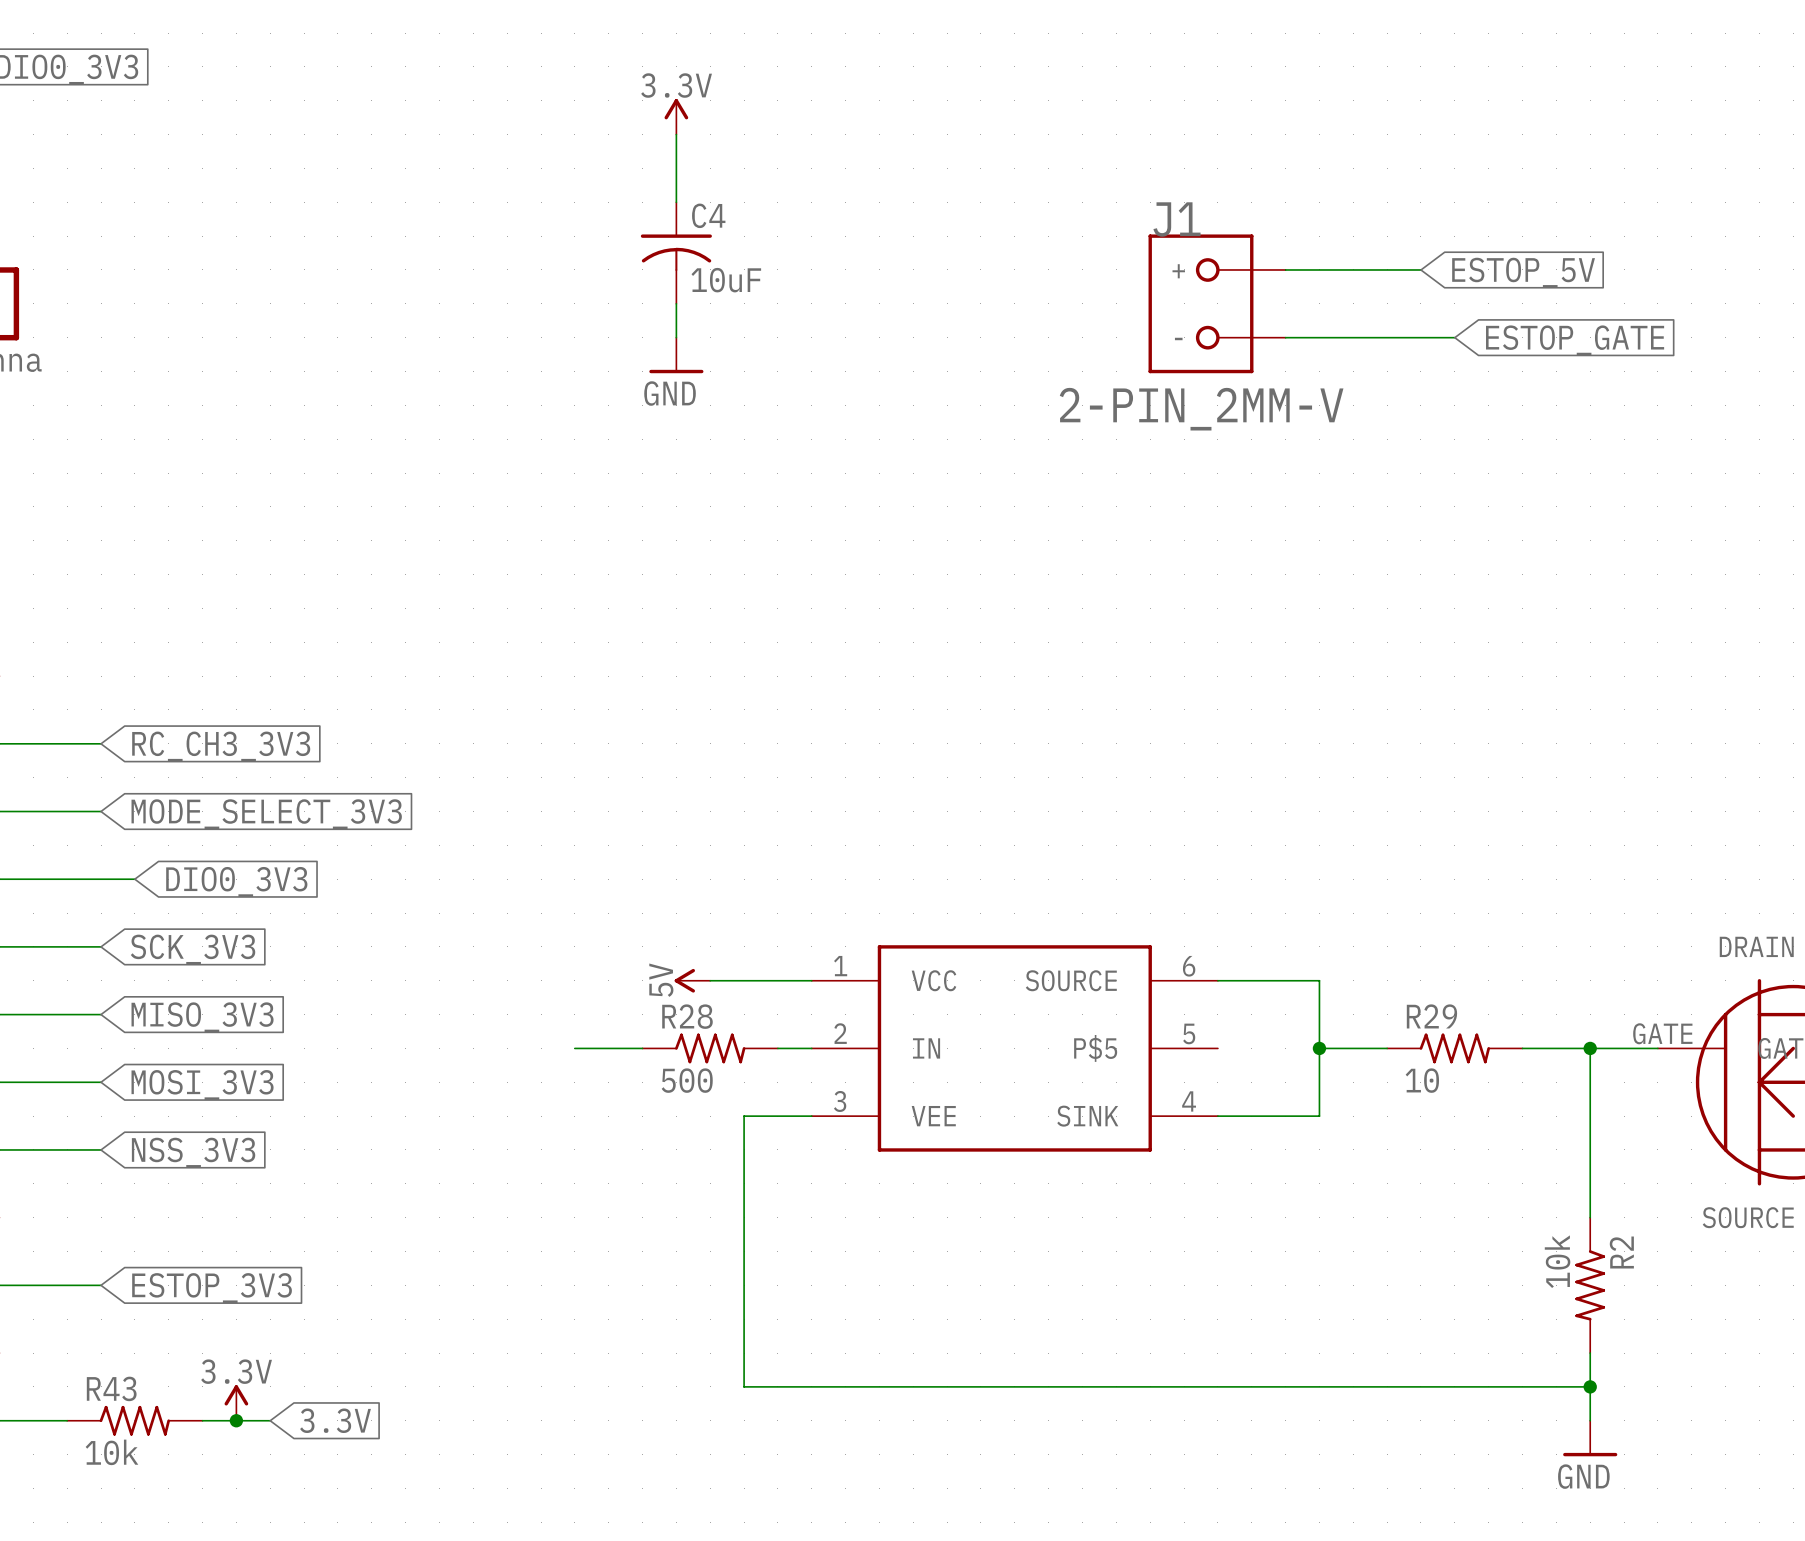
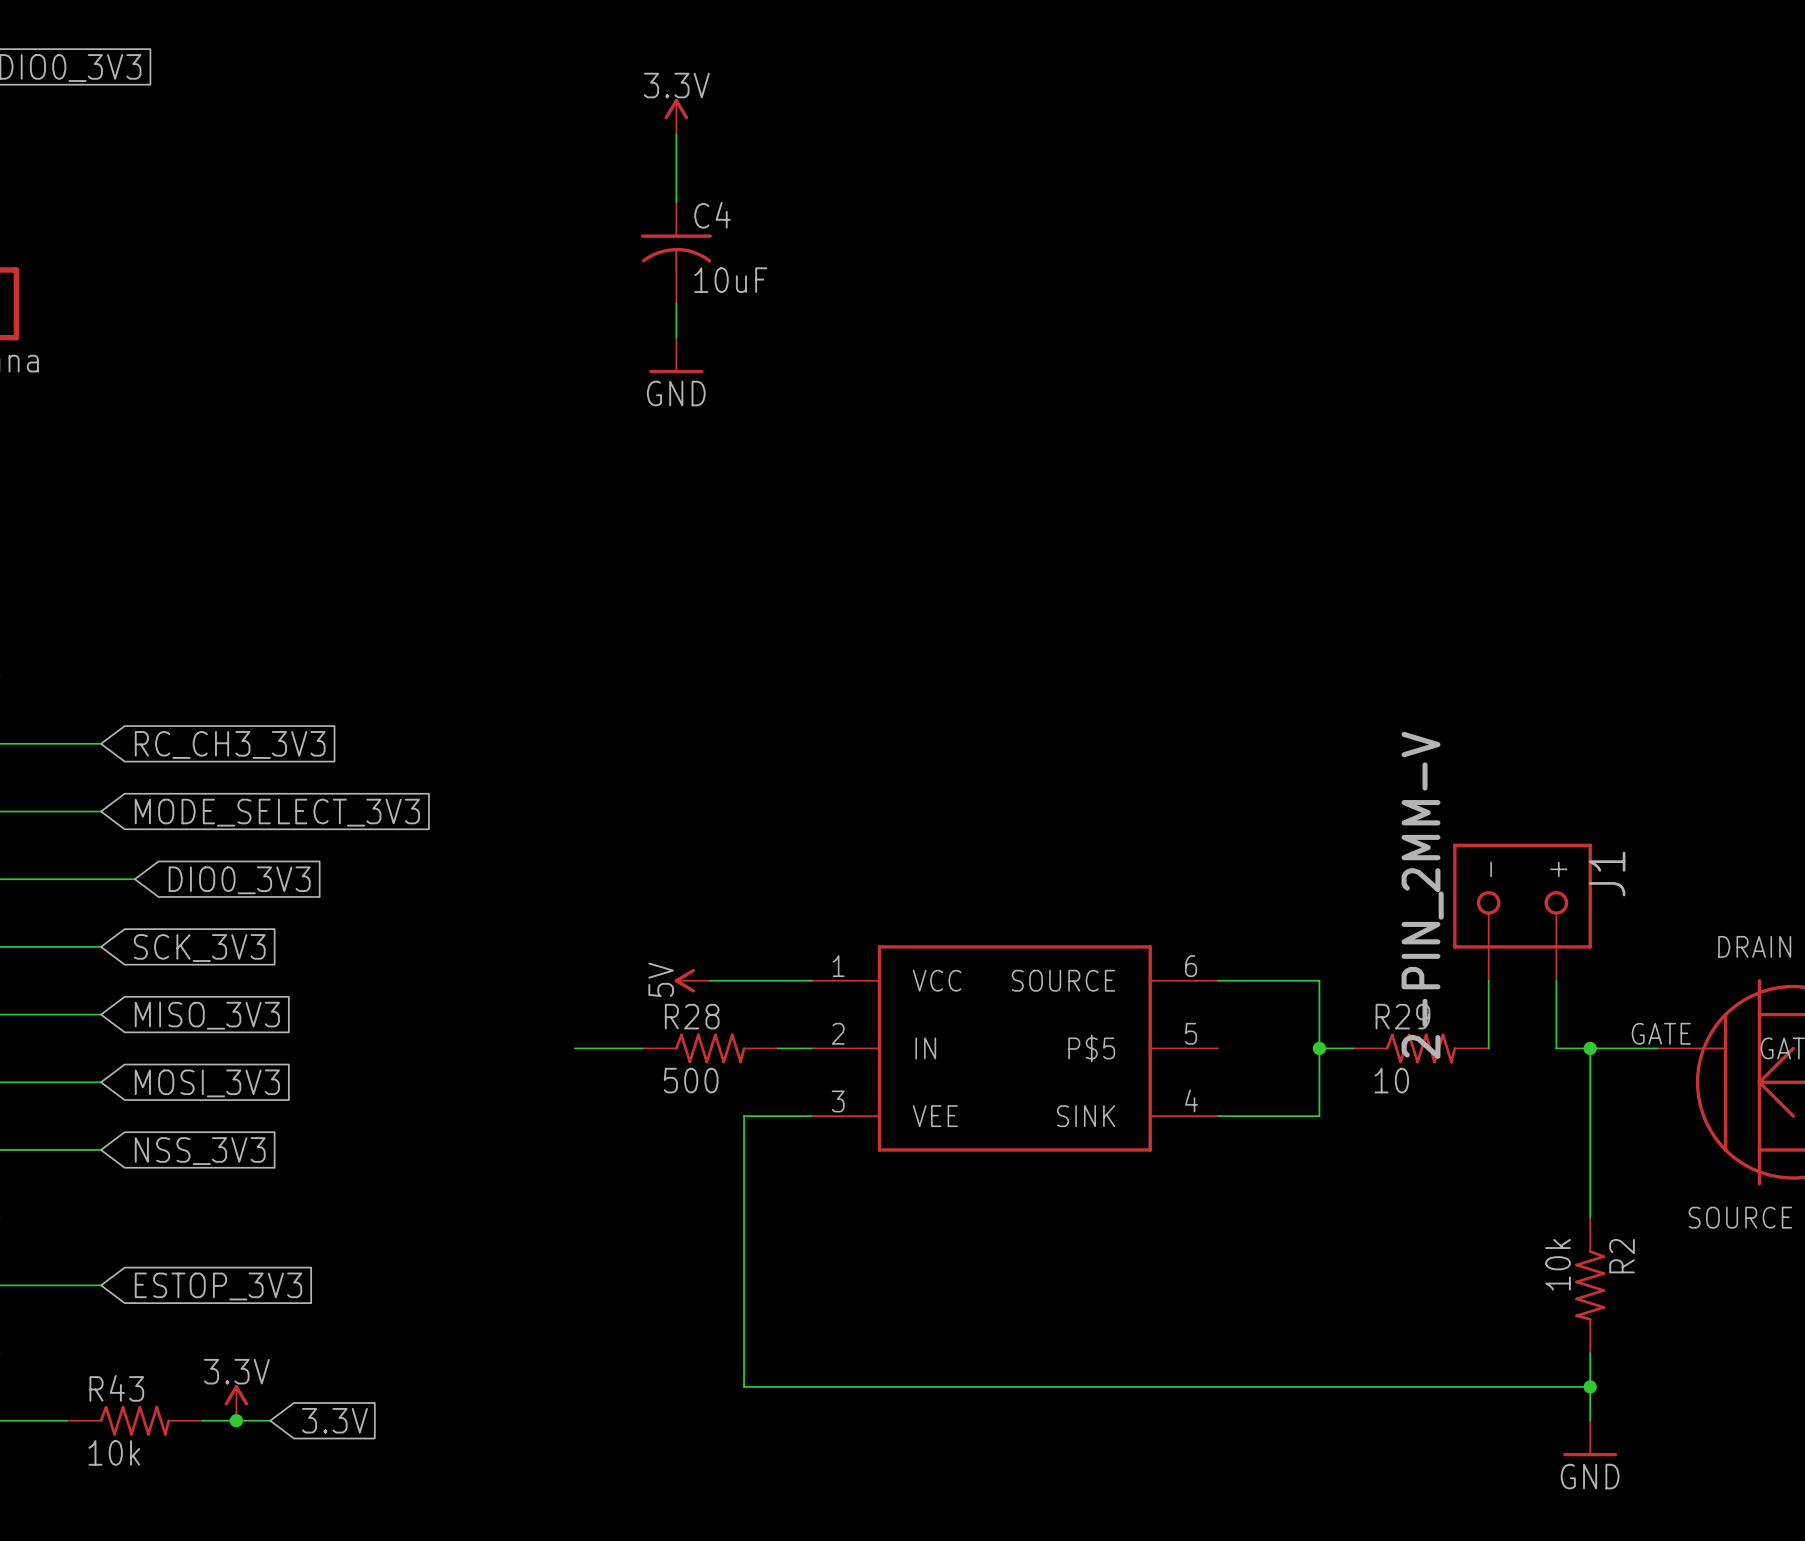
wire: (1285, 269) (1420, 269) -> none
global label: ESTOP_5V (1523, 272) -> none
J1 rotation: 0° (1200, 303) -> 90° clockwise (1522, 896)
J1 position: (1217, 303) -> (1522, 912)
wire: (1285, 337) (1454, 337) -> none
global label: ESTOP_GATE (1575, 340) -> none
wire: none -> (1488, 980) (1488, 1048)
R29 position: (1454, 1048) -> (1420, 1048)
wire: (1522, 1048) (1556, 1048) -> (1556, 980) (1556, 1048)

